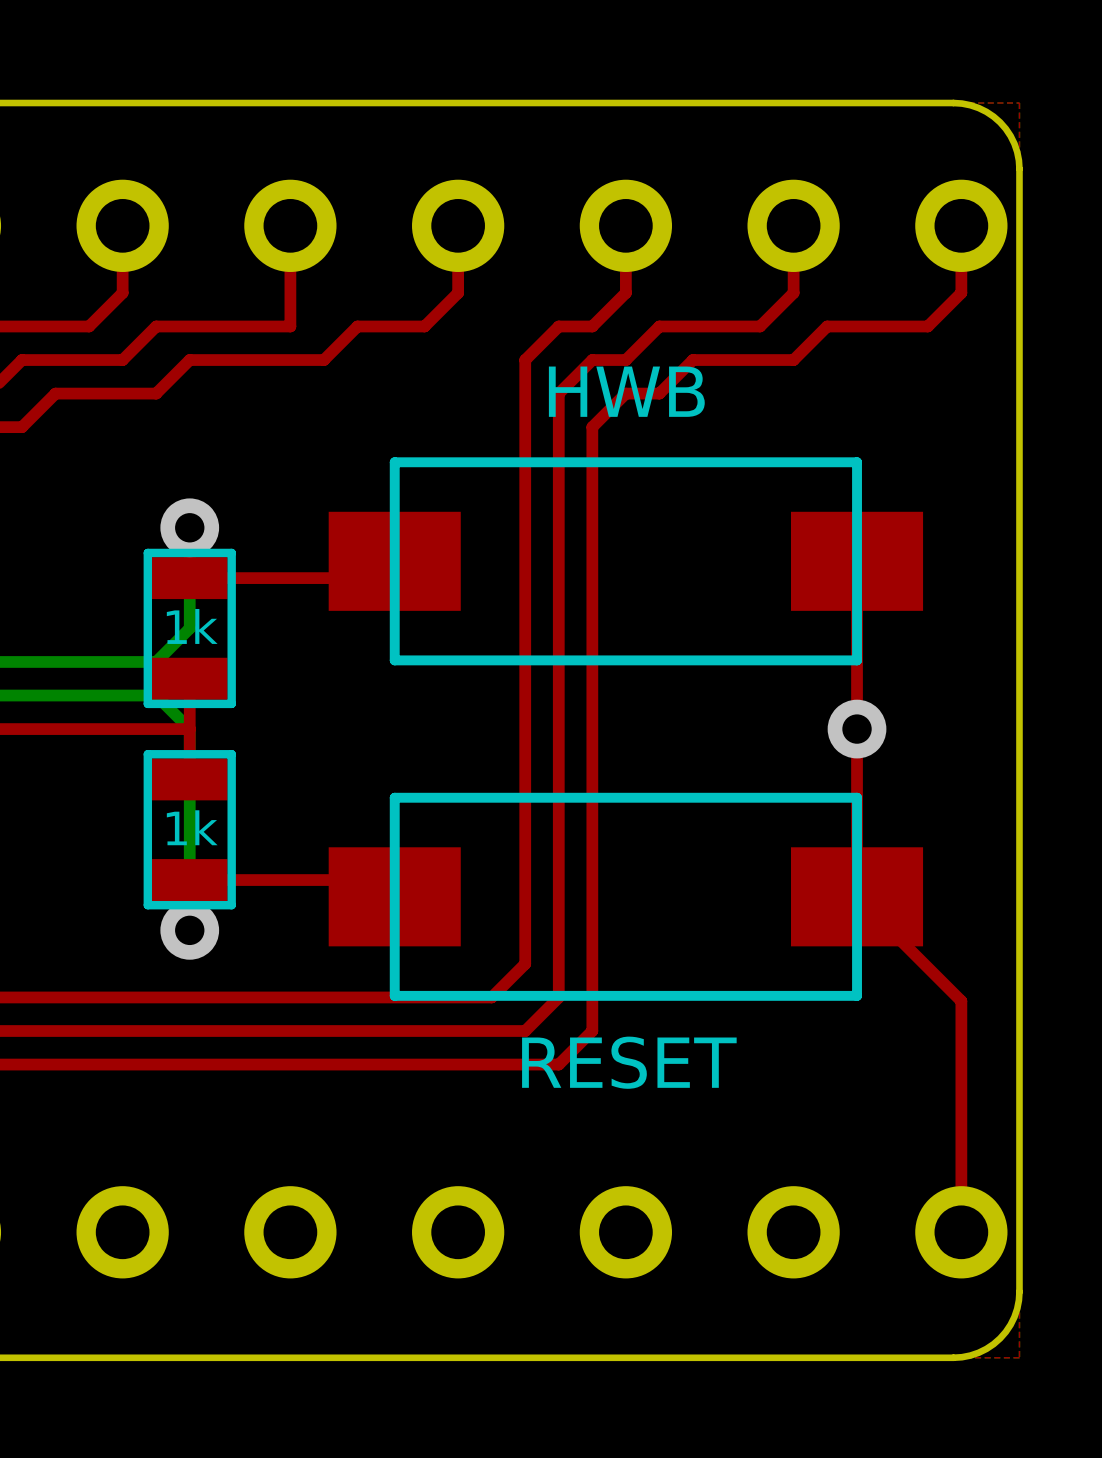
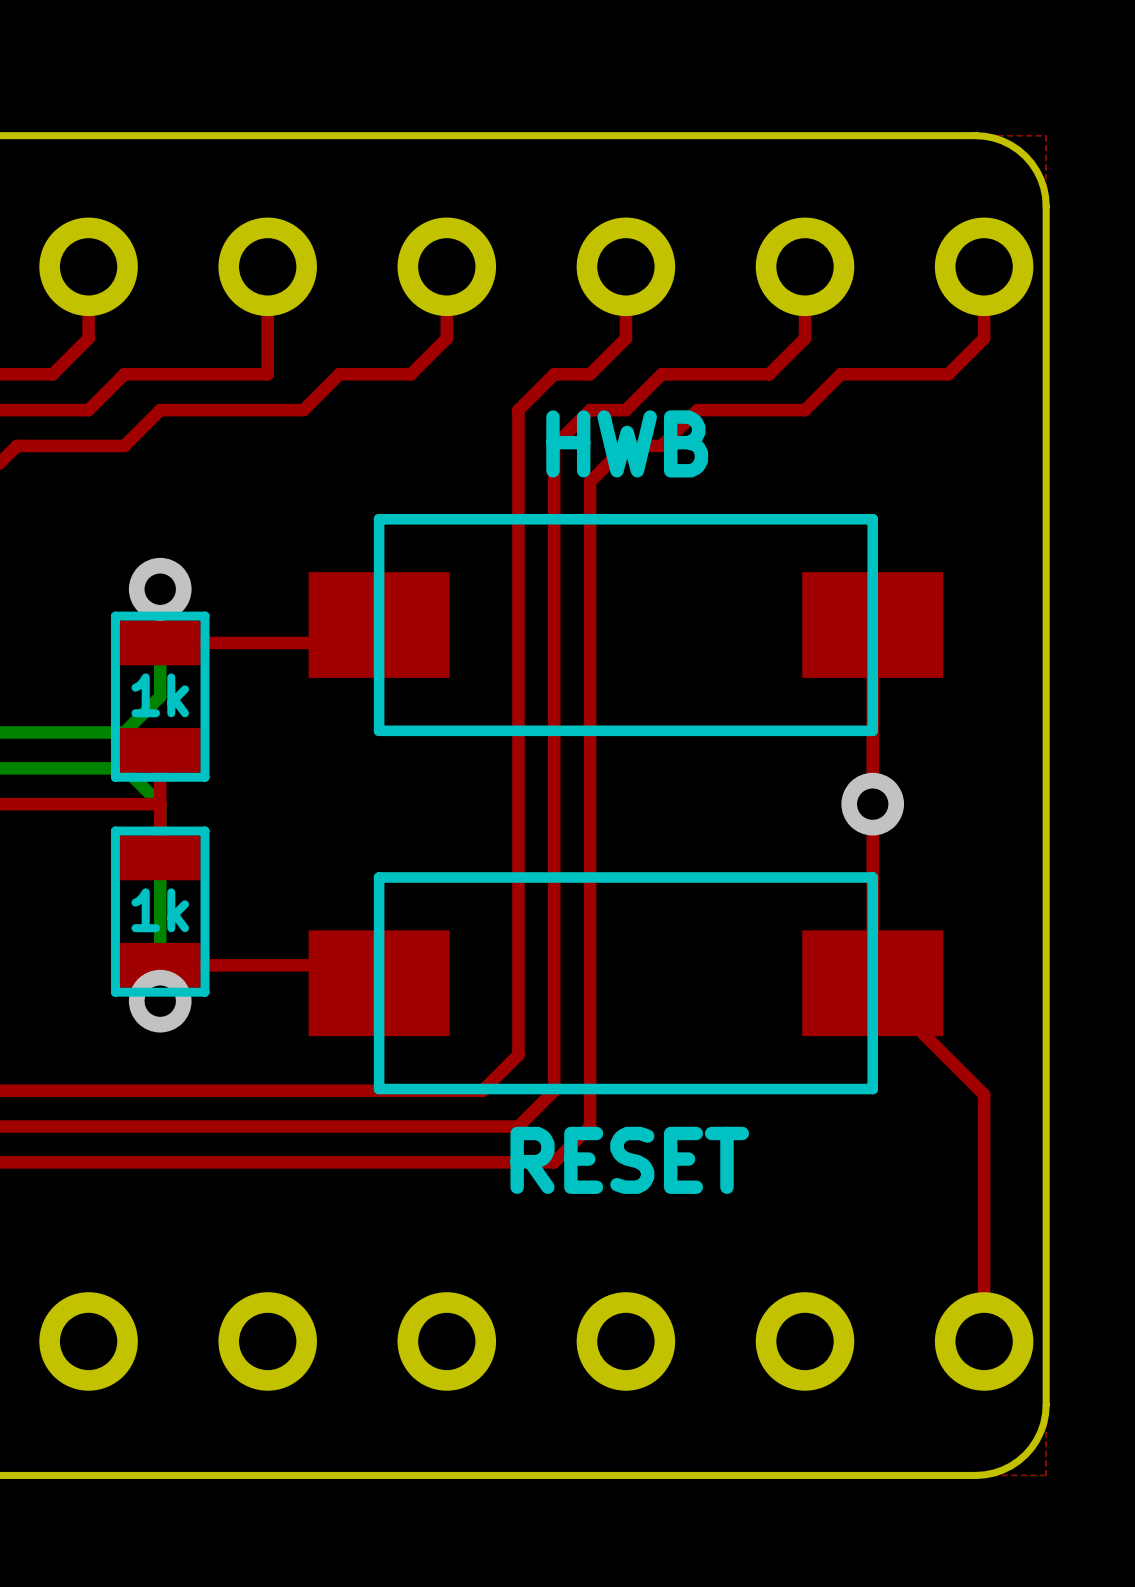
via position: (189, 930) -> (160, 1001)

